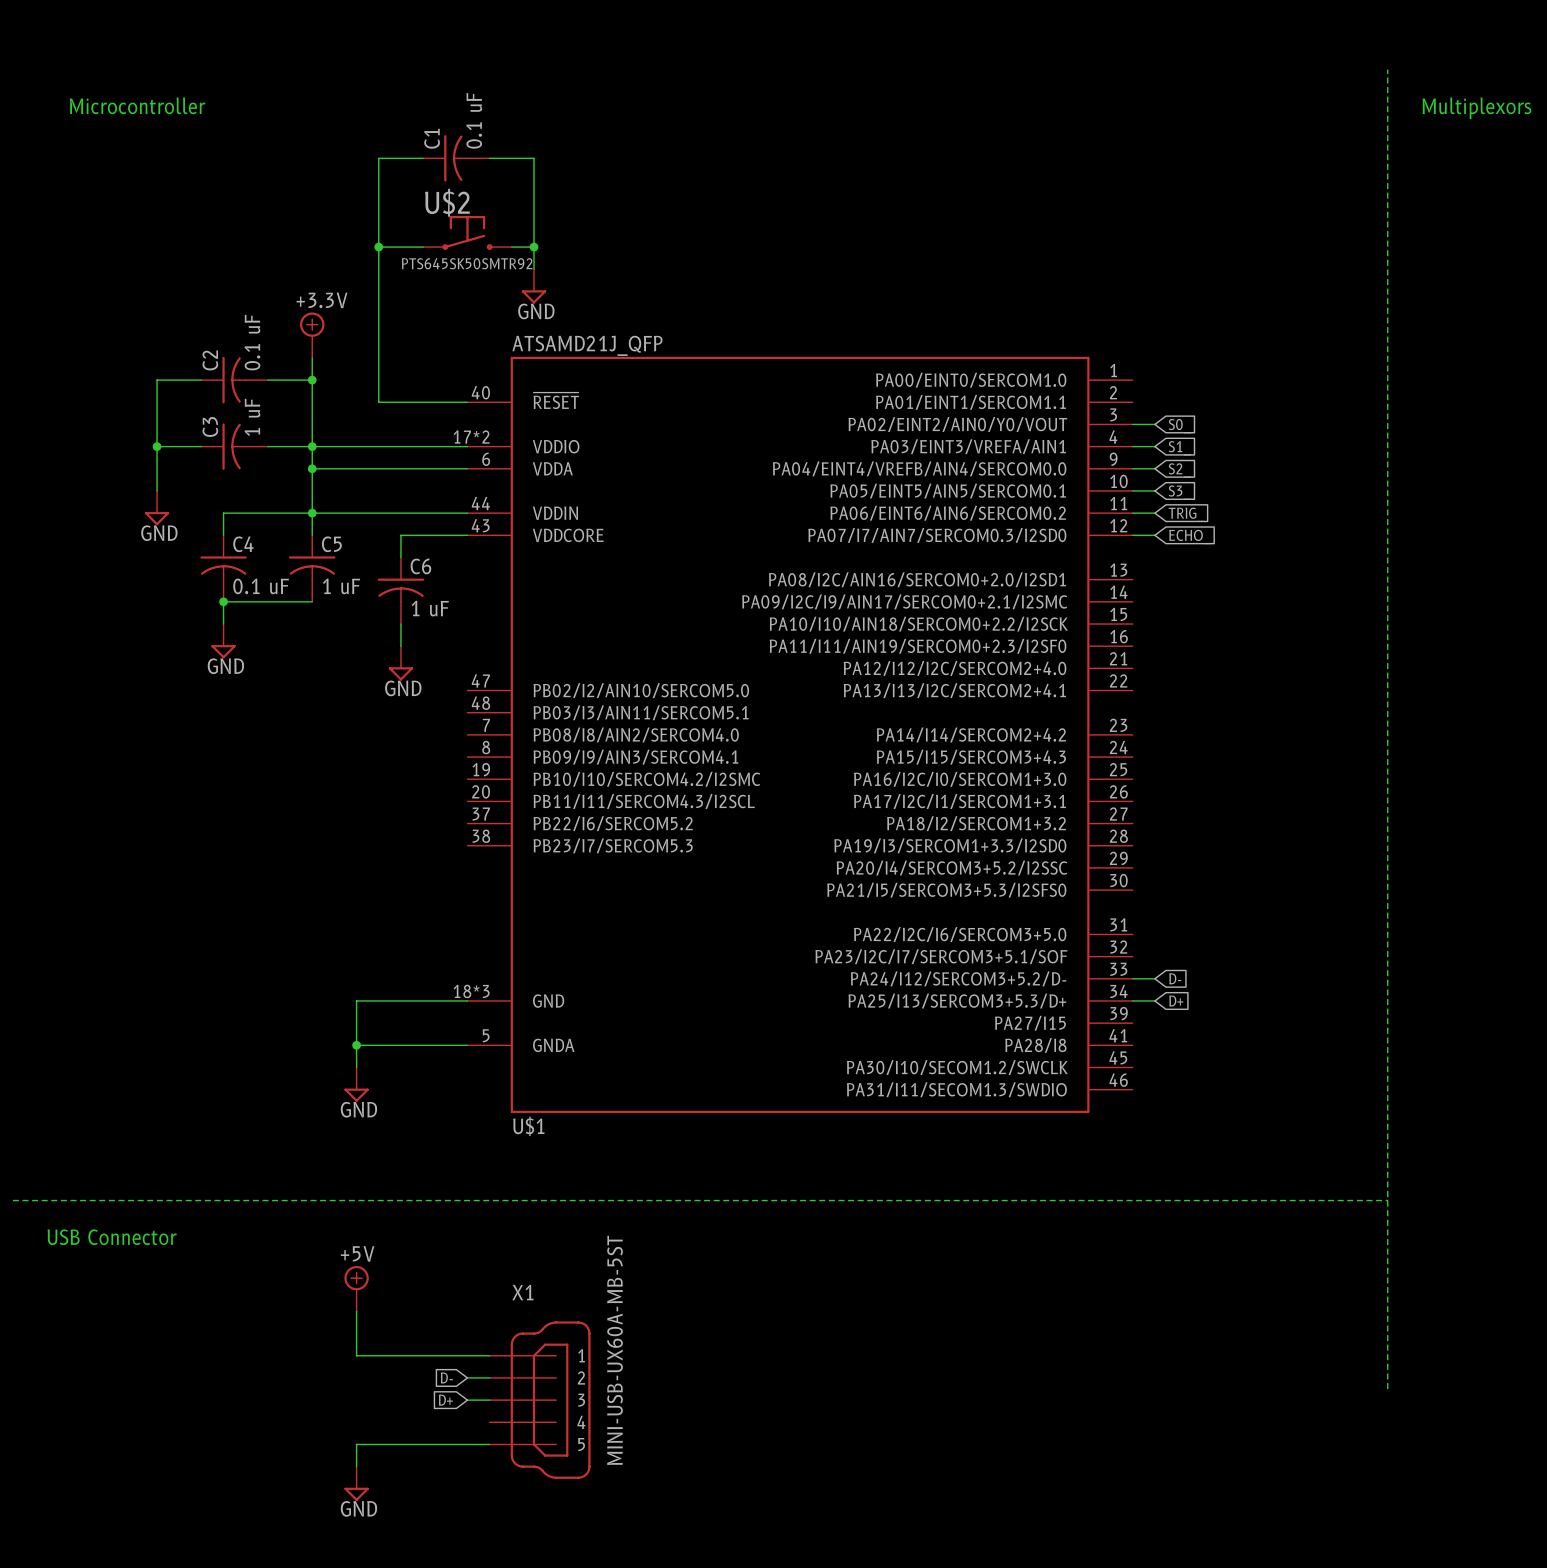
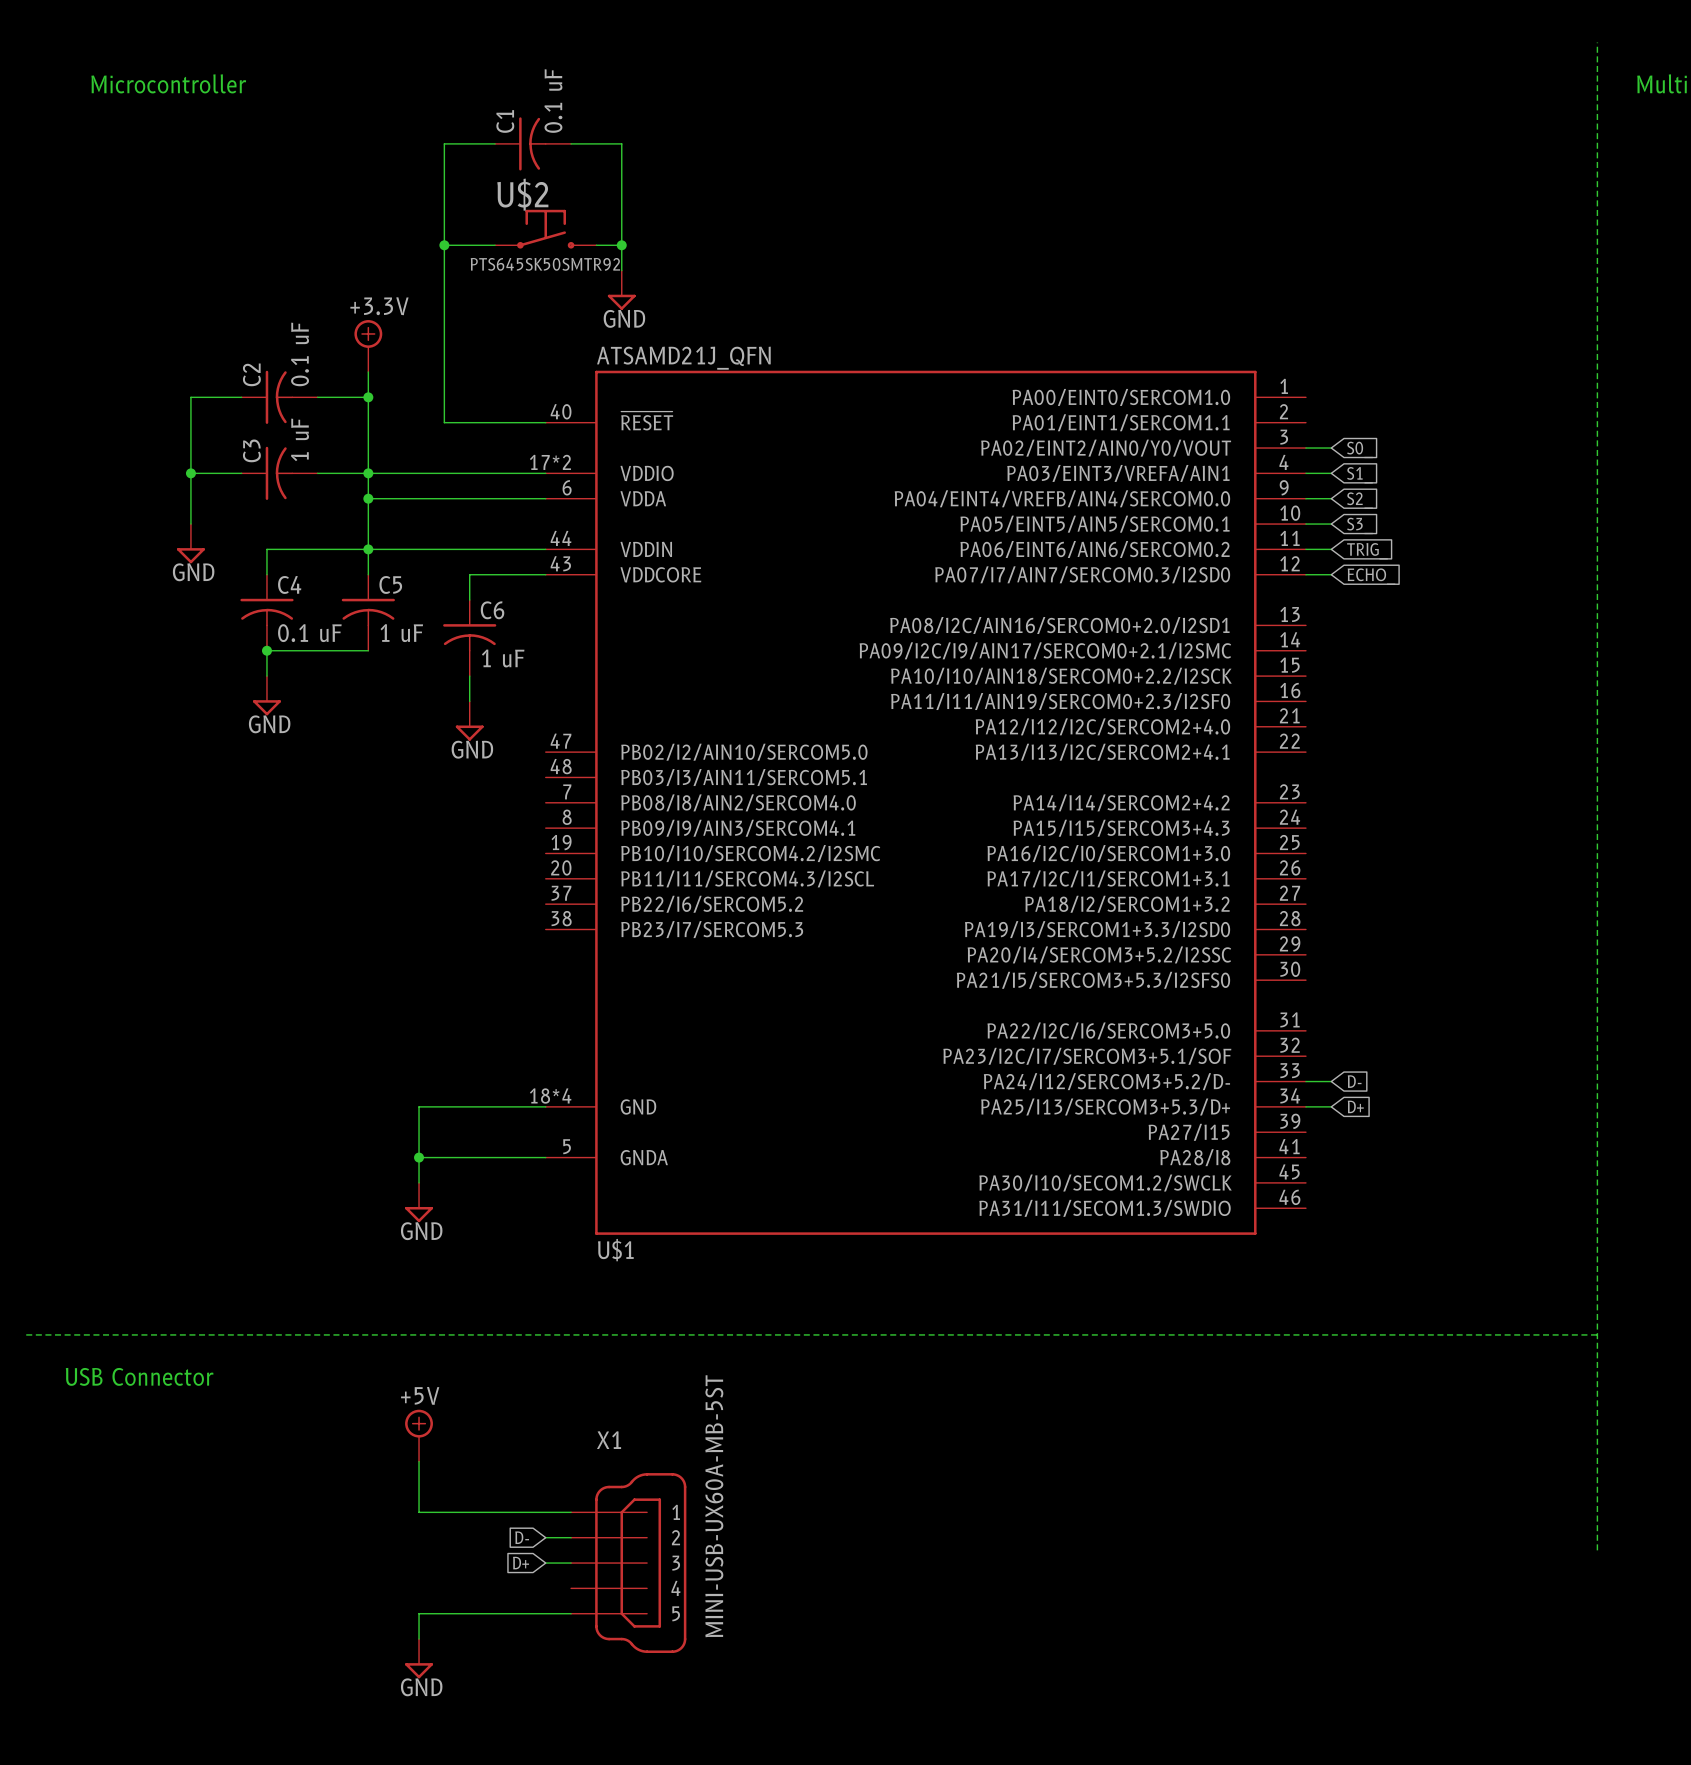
U$1 value: ATSAMD21J_QFP (587, 345) -> ATSAMD21J_QFN (683, 358)
U$1 pin number: 18*3 (471, 991) -> 18*4 (550, 1096)

